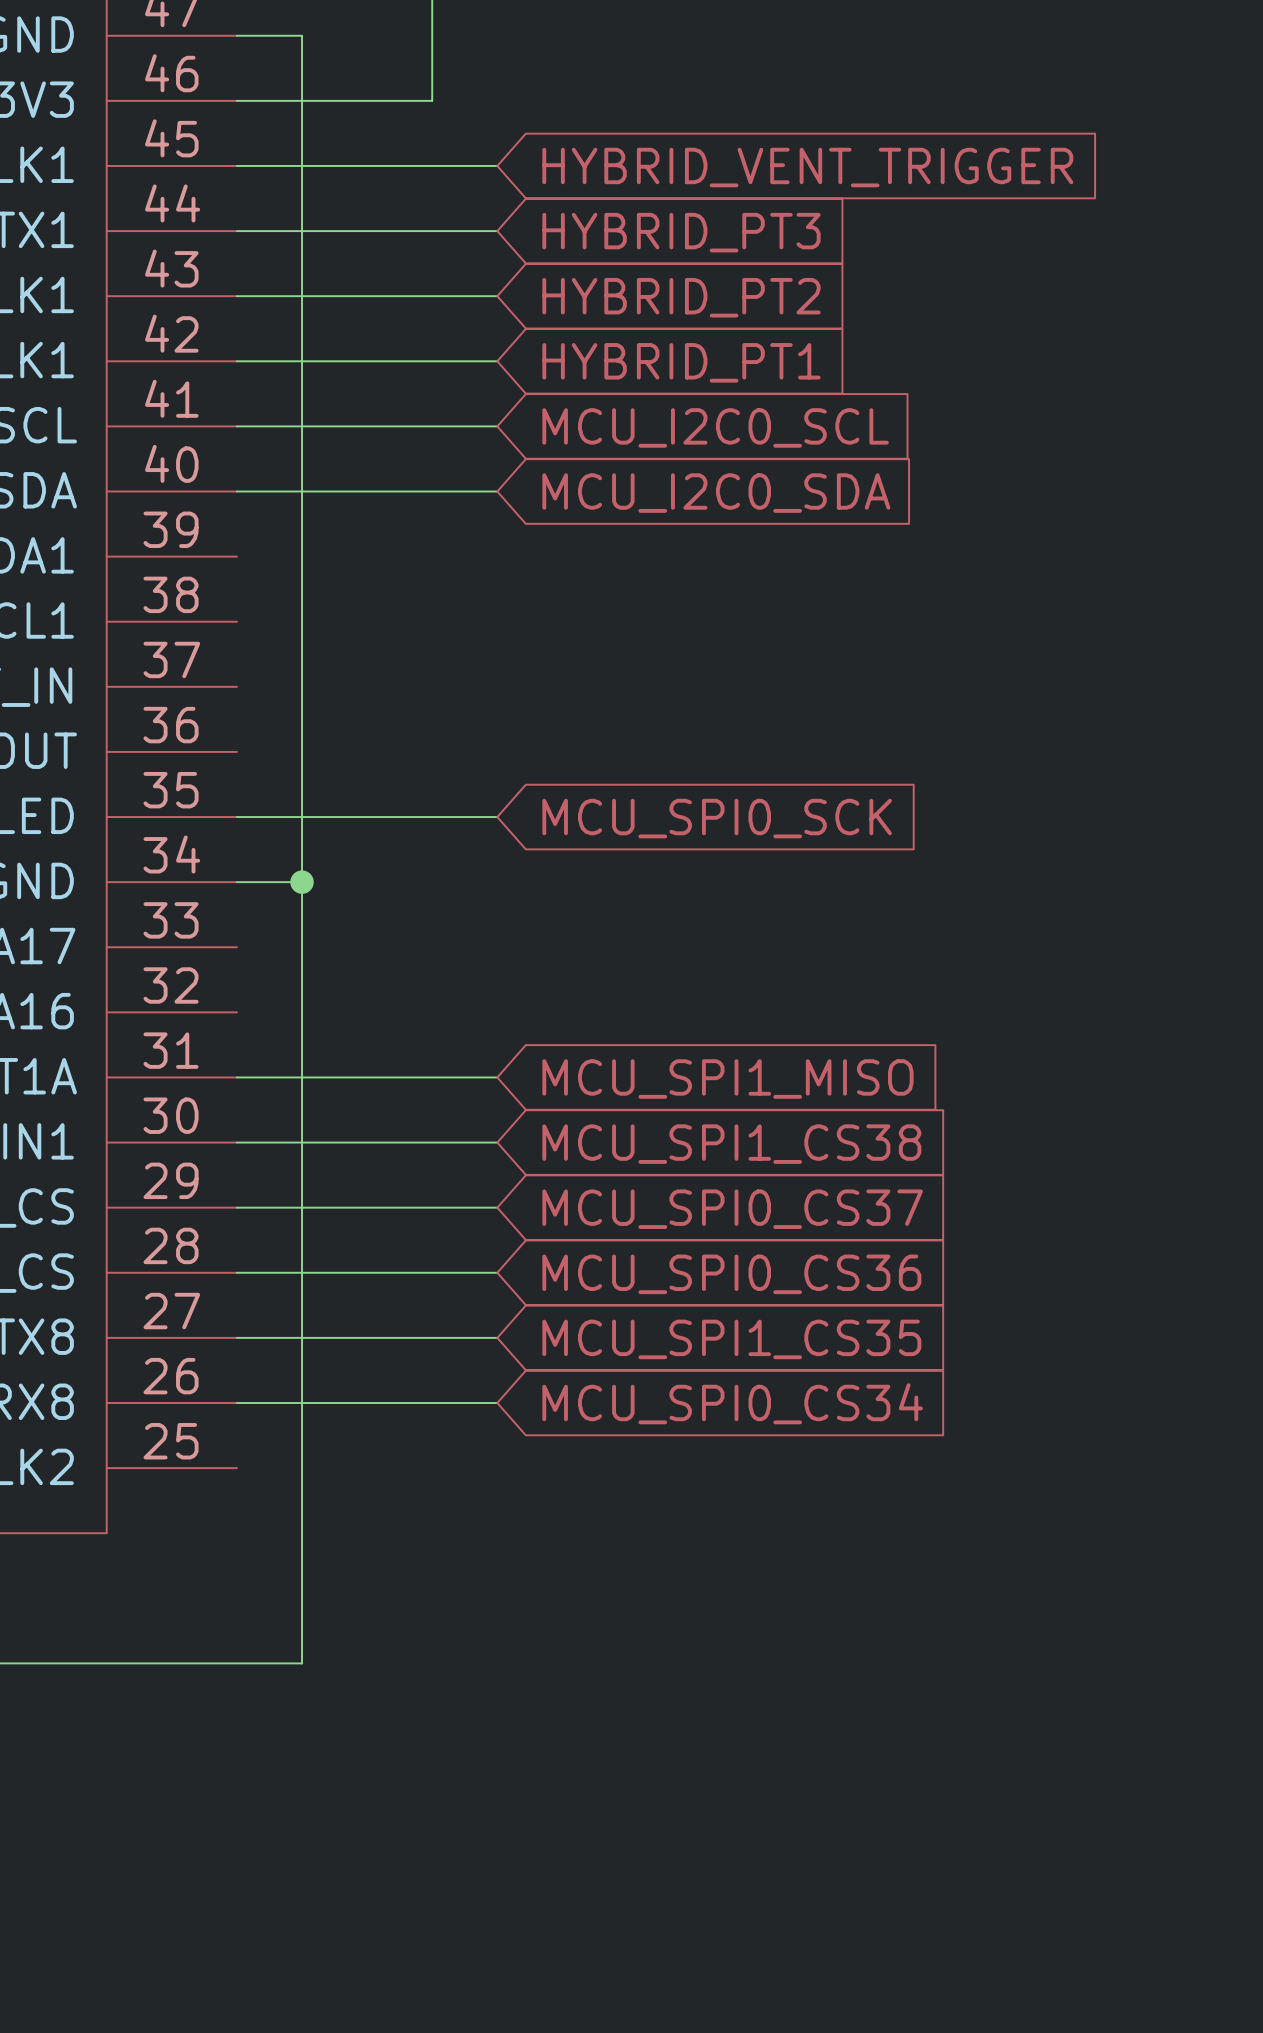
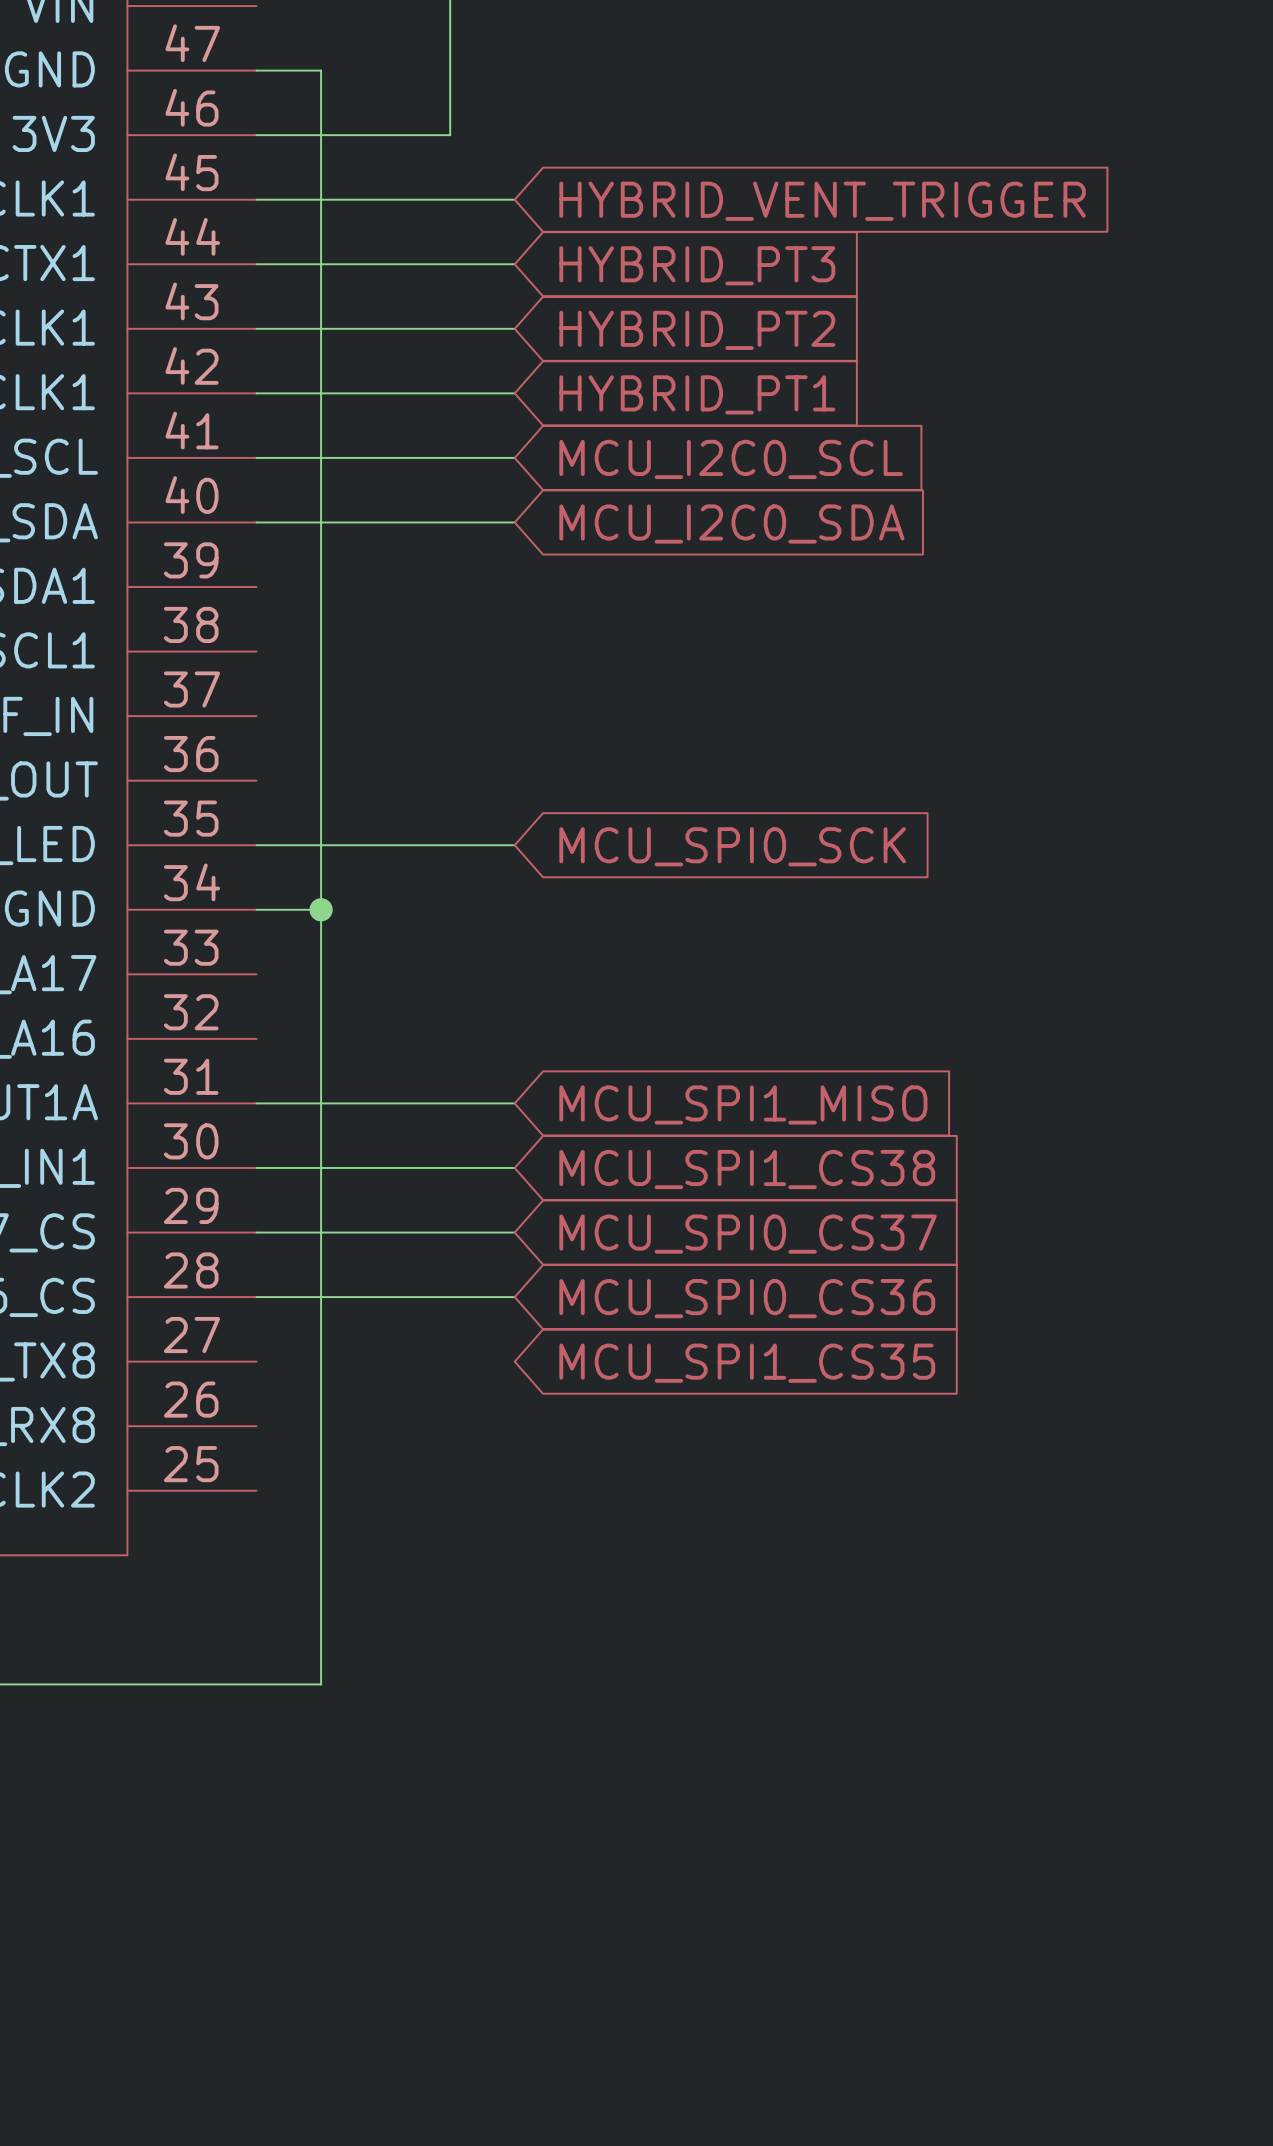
wire: (236, 1337) (497, 1337) -> none
wire: (236, 1402) (497, 1402) -> none
global label: MCU_SPI0_CS34 (732, 1403) -> none

